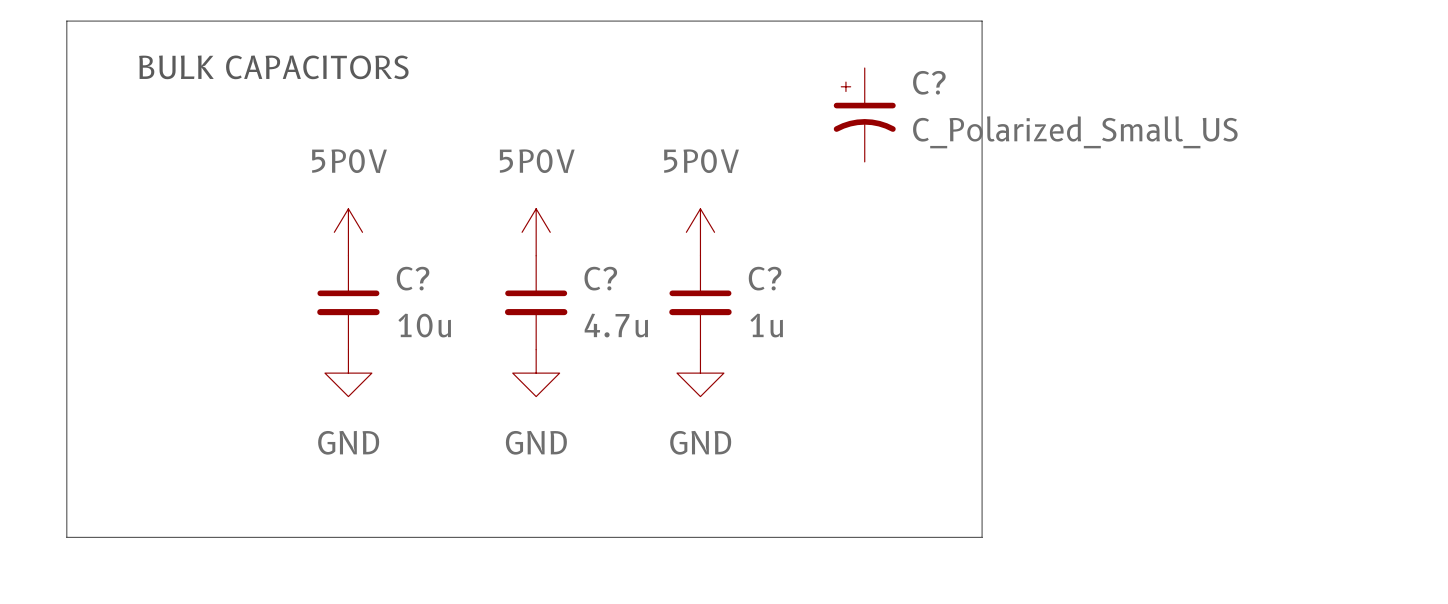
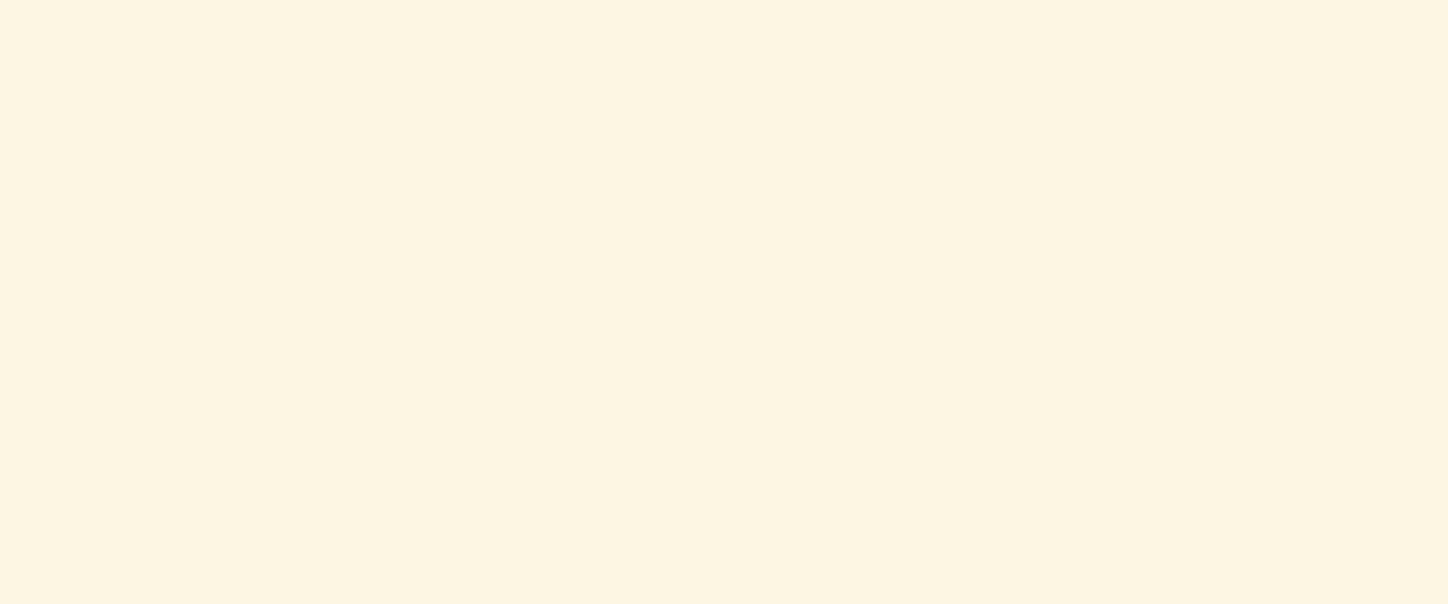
line: (66, 21) (982, 21) (982, 537) (66, 537) (66, 21) -> none
text: BULK CAPACITORS (273, 67) -> none
C?: C_Polarized_Small_US (864, 114) -> none
power symbol: 5P0V (348, 232) -> none
power symbol: 5P0V (536, 232) -> none
power symbol: 5P0V (700, 232) -> none
C?: 10u (348, 302) -> none
C?: 4.7u (536, 302) -> none
C?: 1u (700, 302) -> none
power symbol: GND (348, 373) -> none
power symbol: GND (536, 373) -> none
power symbol: GND (700, 373) -> none

